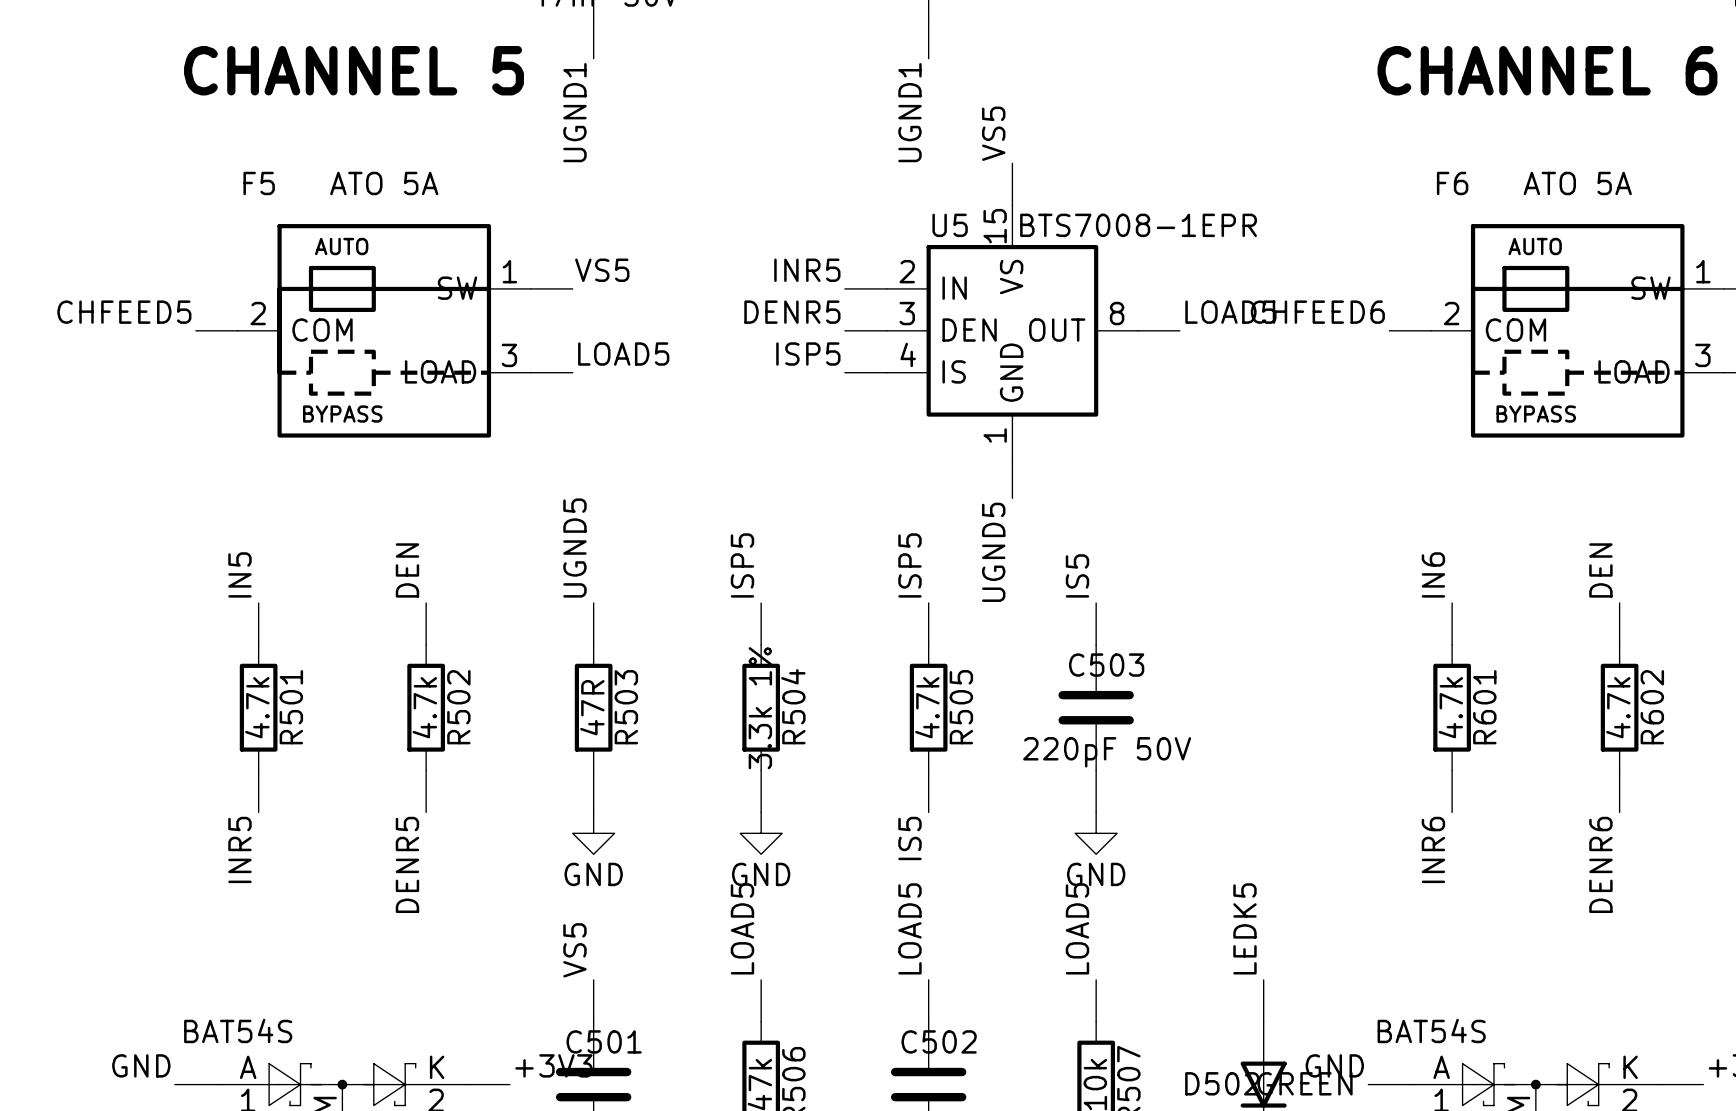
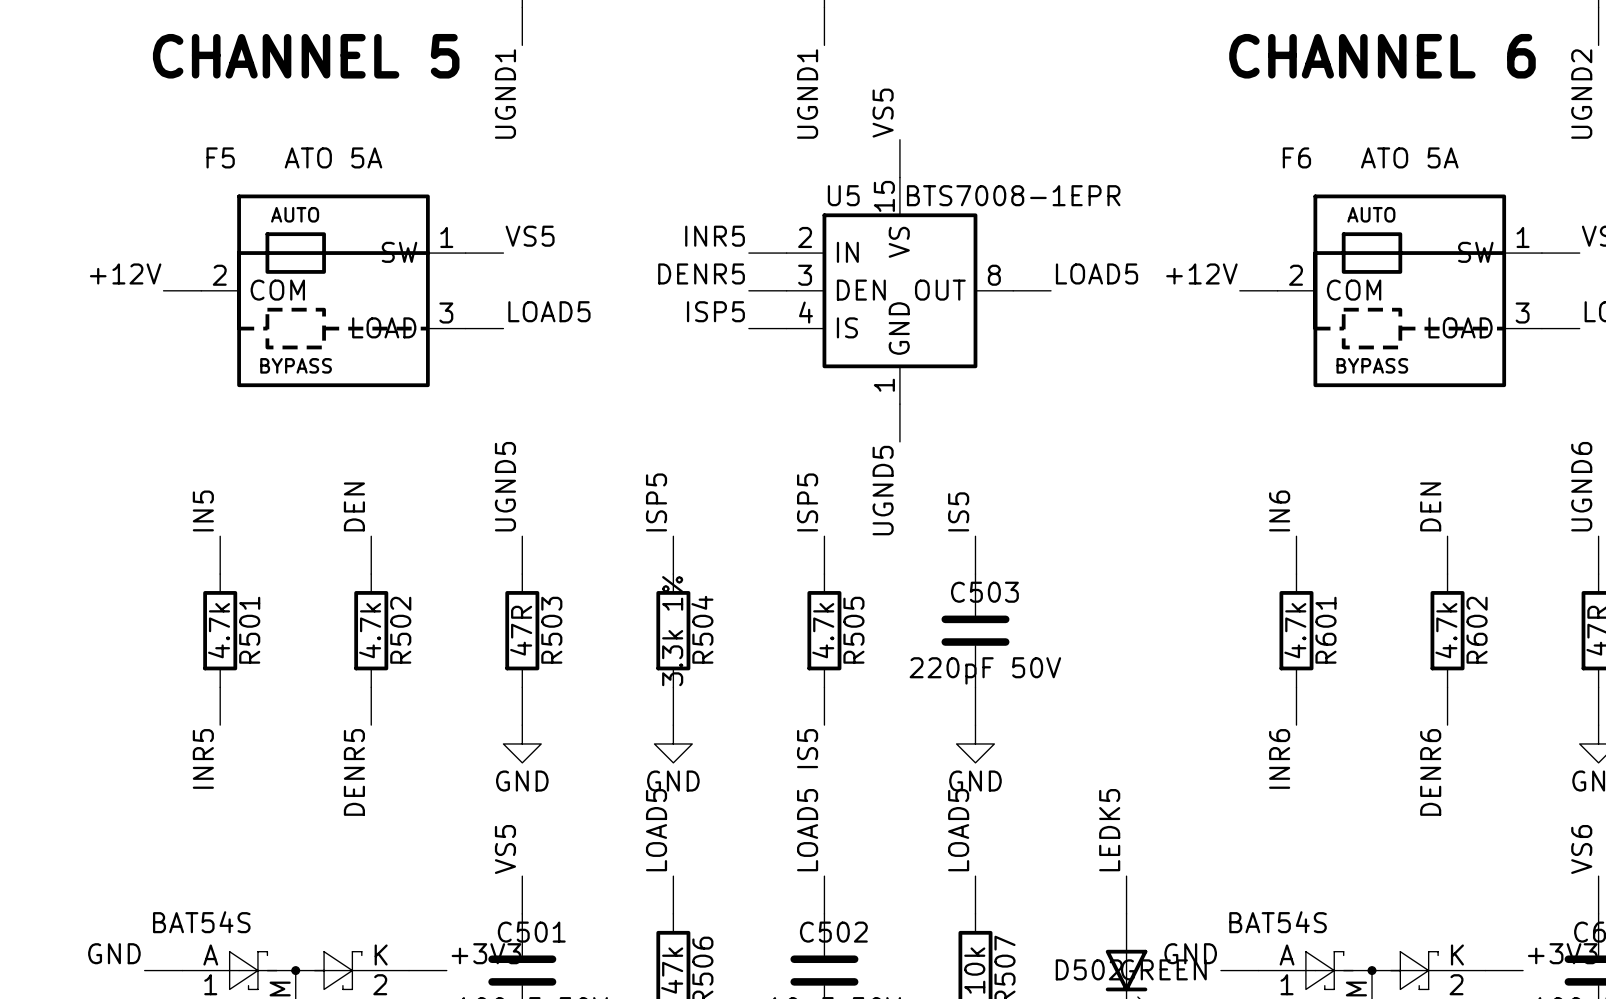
label: CHFEED5 (124, 312) -> +12V (125, 273)
label: CHFEED6 (1317, 312) -> +12V (1201, 273)

